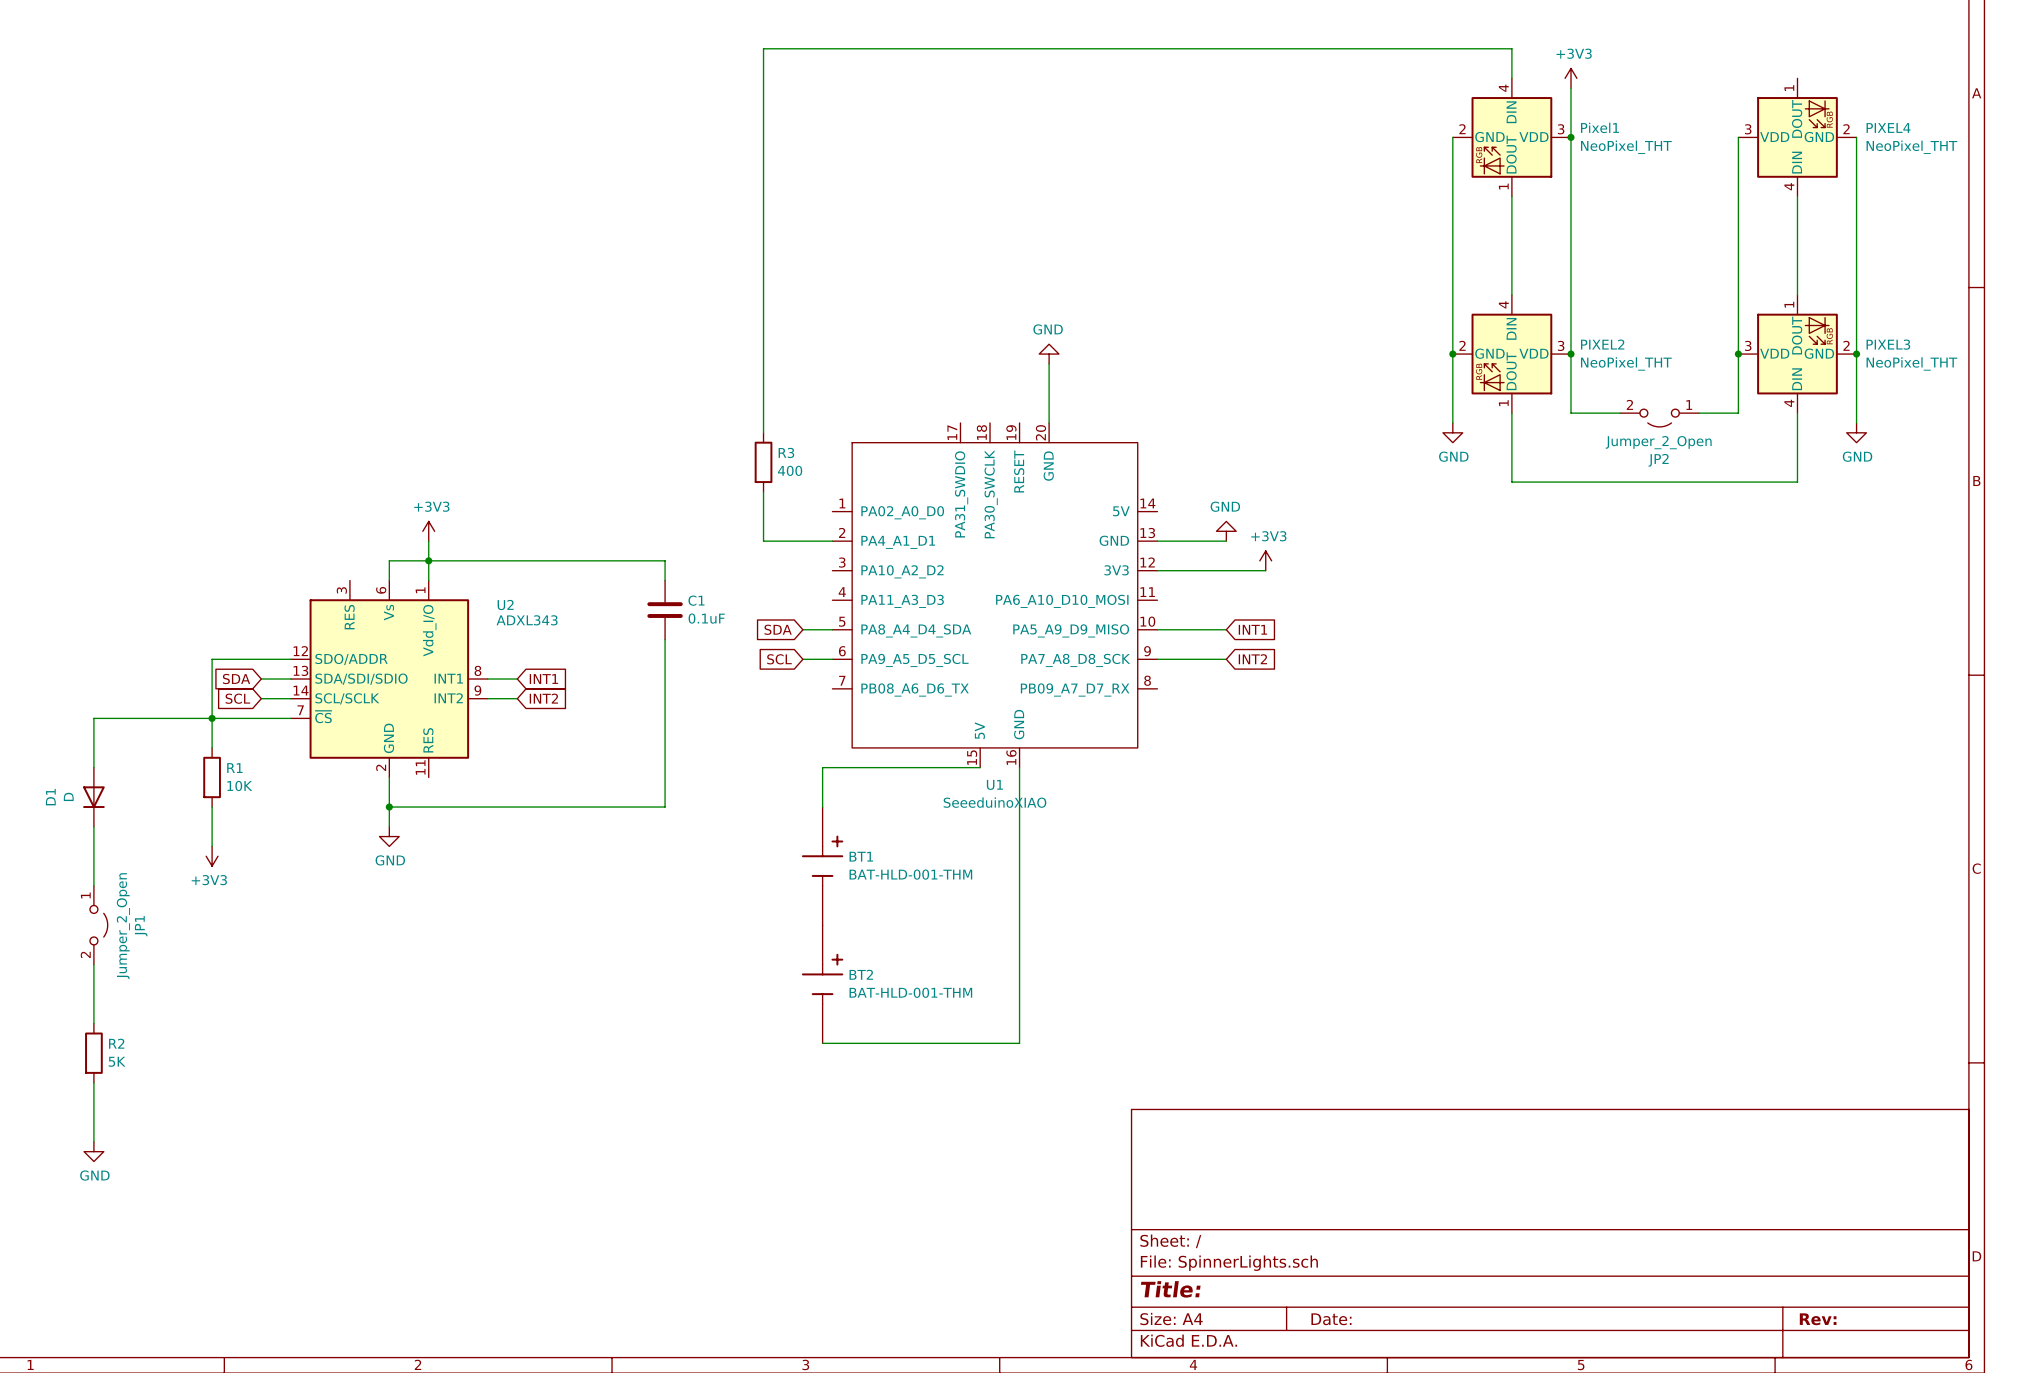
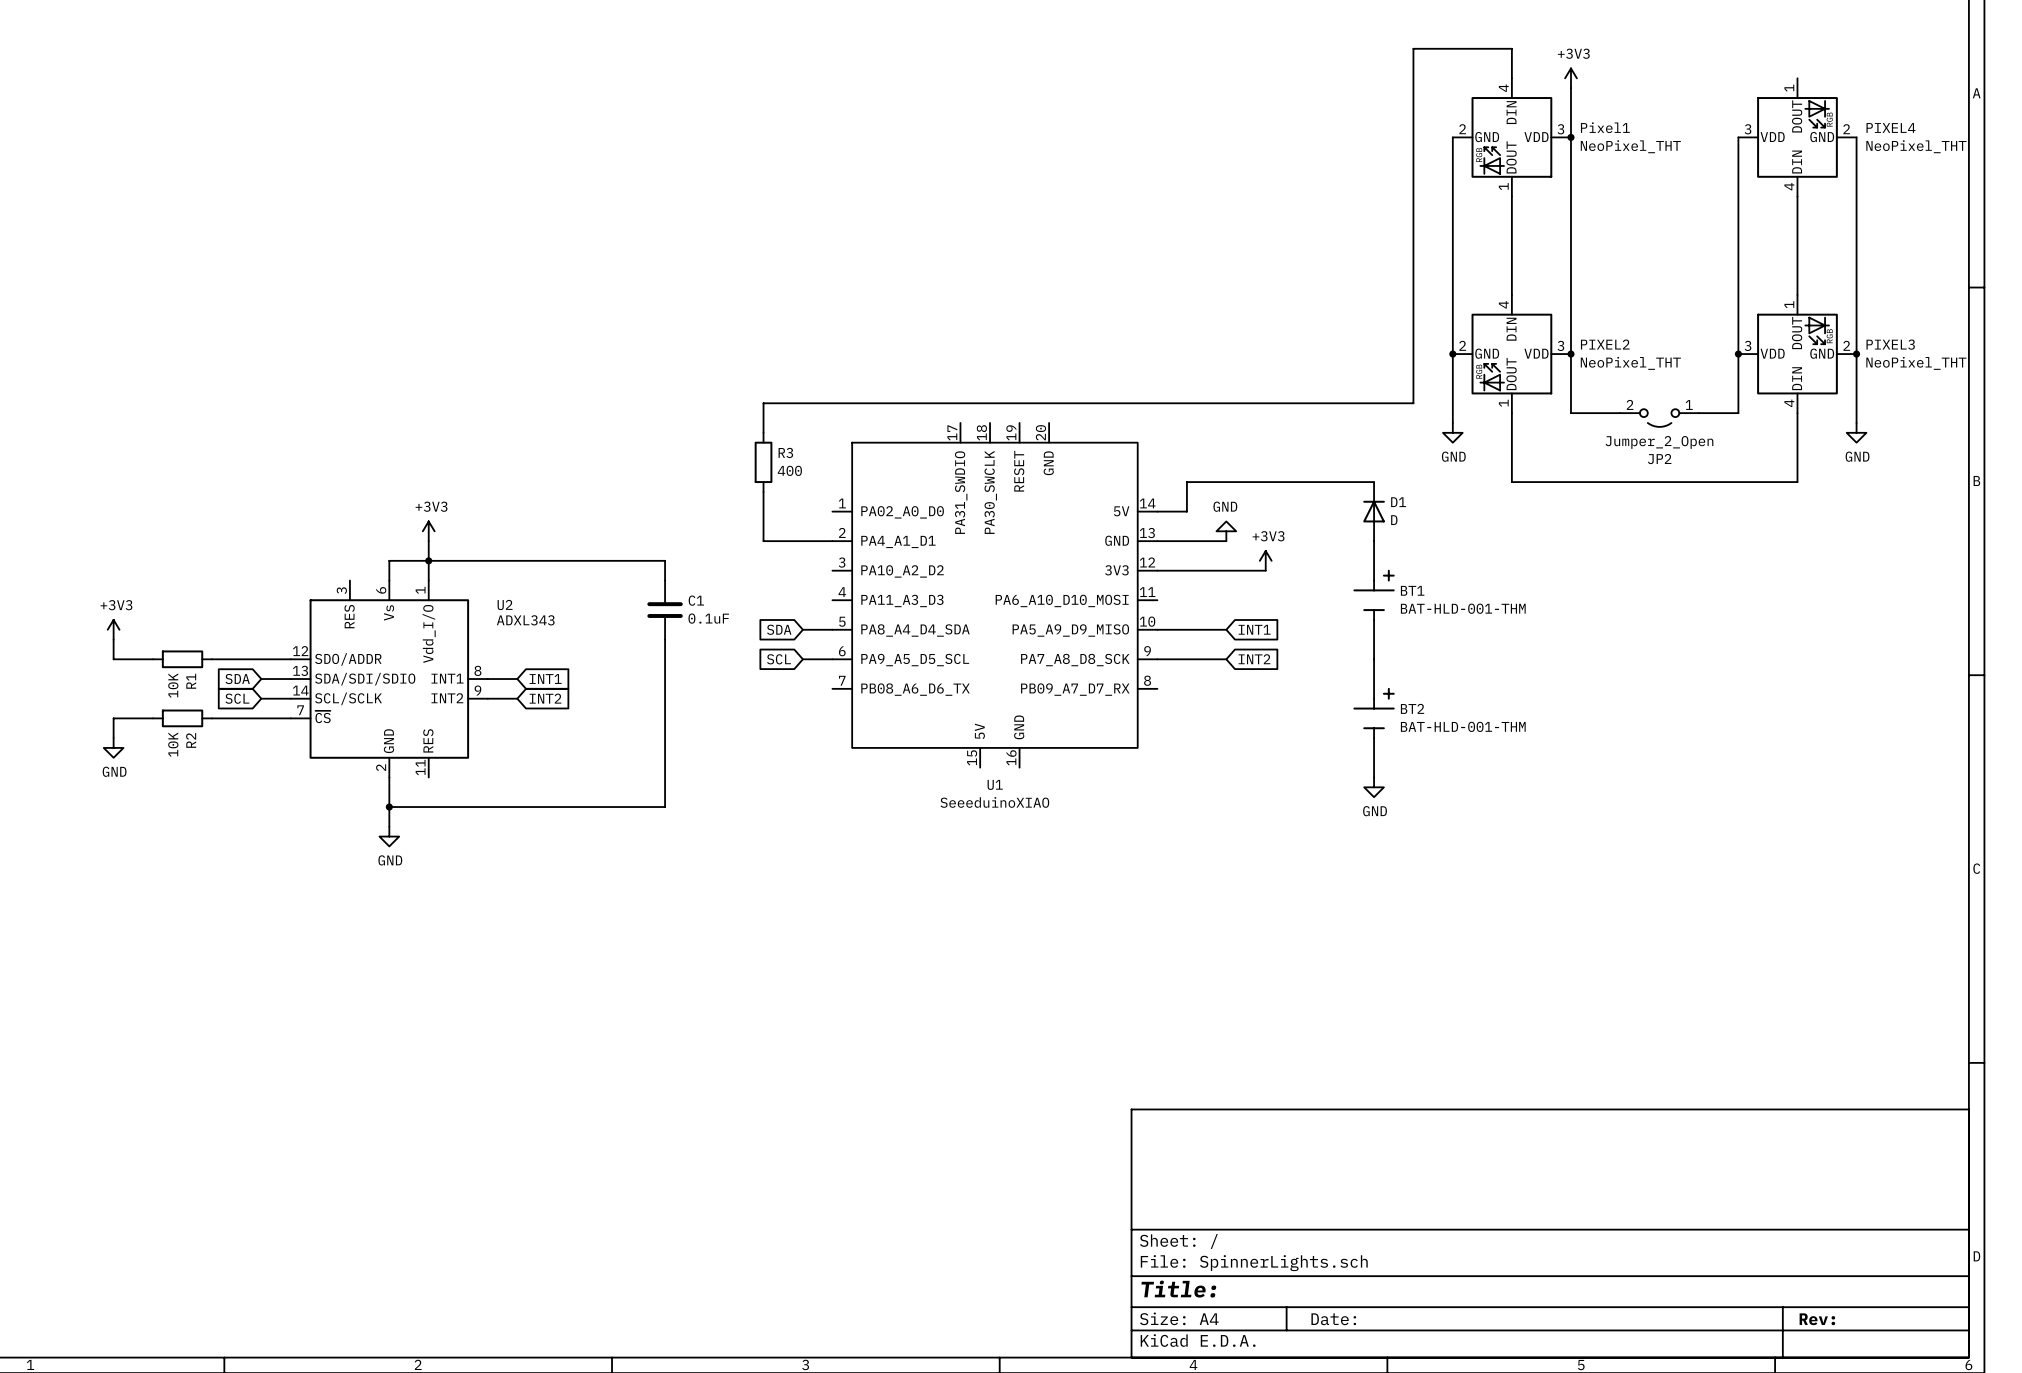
wire: (1413, 48) (763, 48) (763, 403) -> (1413, 48) (1413, 403) (763, 403)
power symbol: GND (1049, 354) -> none
wire: (1049, 363) (1049, 422) -> none
wire: none -> (1374, 482) (1186, 482) (1186, 511) (1157, 511)
power symbol: none -> +3V3 (113, 629)
wire: none -> (113, 639) (113, 659) (153, 659)
wire: (212, 659) (212, 747) -> none
wire: (113, 718) (93, 718) (93, 767) -> (113, 718) (113, 738)
wire: (153, 718) (212, 718) -> none
junction: (212, 718) -> none
power symbol: none -> GND (113, 747)
wire: (980, 767) (822, 767) (822, 807) -> none
wire: (1019, 767) (1019, 1043) (822, 1043) -> none
R1 rotation: 0° (212, 777) -> 90° clockwise (182, 659)
R1 position: (212, 777) -> (182, 659)
power symbol: none -> GND (1374, 787)
D1 name position: D1 (50, 797) -> D1 (1398, 502)
D1 rotation: 0° (93, 797) -> 180° (1374, 511)
D1 position: (93, 797) -> (1374, 511)
wire: (212, 807) (212, 846) -> none
wire: (93, 826) (93, 885) -> none
power symbol: +3V3 (212, 856) -> none
BT1 position: (822, 866) -> (1374, 600)
JP1: Jumper_2_Open (98, 925) -> none
wire: (93, 964) (93, 1023) -> none
BT2 position: (822, 984) -> (1374, 718)
R2 rotation: 0° (93, 1053) -> 90° clockwise (182, 718)
R2 position: (93, 1053) -> (182, 718)
R2 value: 5K (117, 1061) -> 10K (173, 744)
wire: (93, 1082) (93, 1141) -> none
power symbol: GND (93, 1151) -> none

